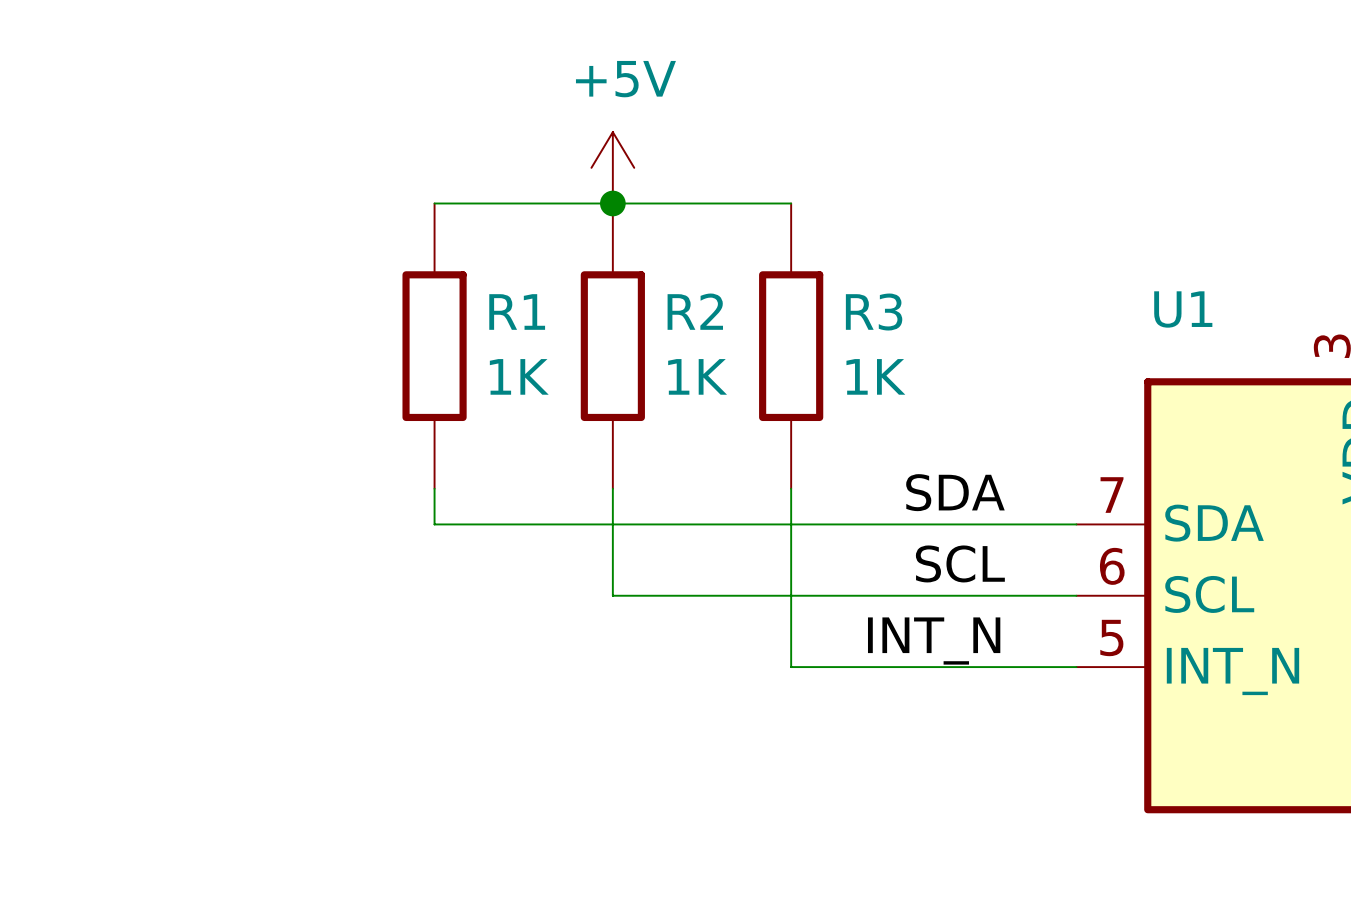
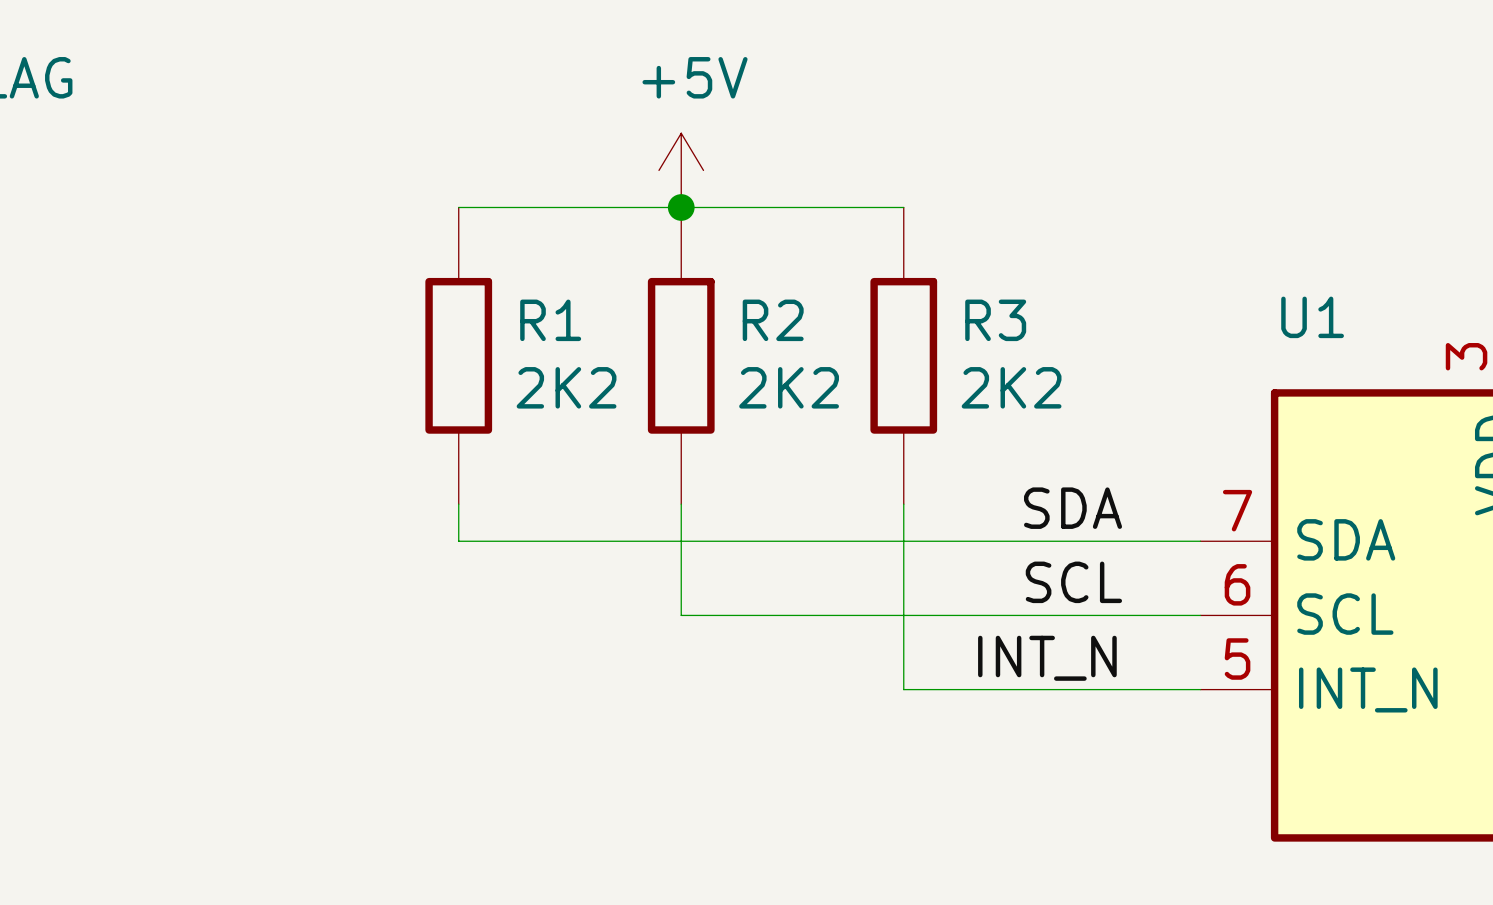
power symbol position: +5V (612, 167) -> +5V (681, 170)
wire: none -> (458, 207) (532, 207)
junction position: (612, 203) -> (681, 207)
R1 position: (434, 346) -> (458, 355)
R2 position: (612, 346) -> (681, 355)
R1 value: 1K (519, 376) -> 2K2 (566, 387)
R2 value: 1K (697, 376) -> 2K2 (789, 387)
R3 value: 1K (875, 376) -> 2K2 (1011, 387)
wire: (434, 488) (434, 524) -> (458, 504) (458, 541) (532, 541)
wire: (612, 488) (612, 595) -> (681, 504) (681, 615) (718, 615)

